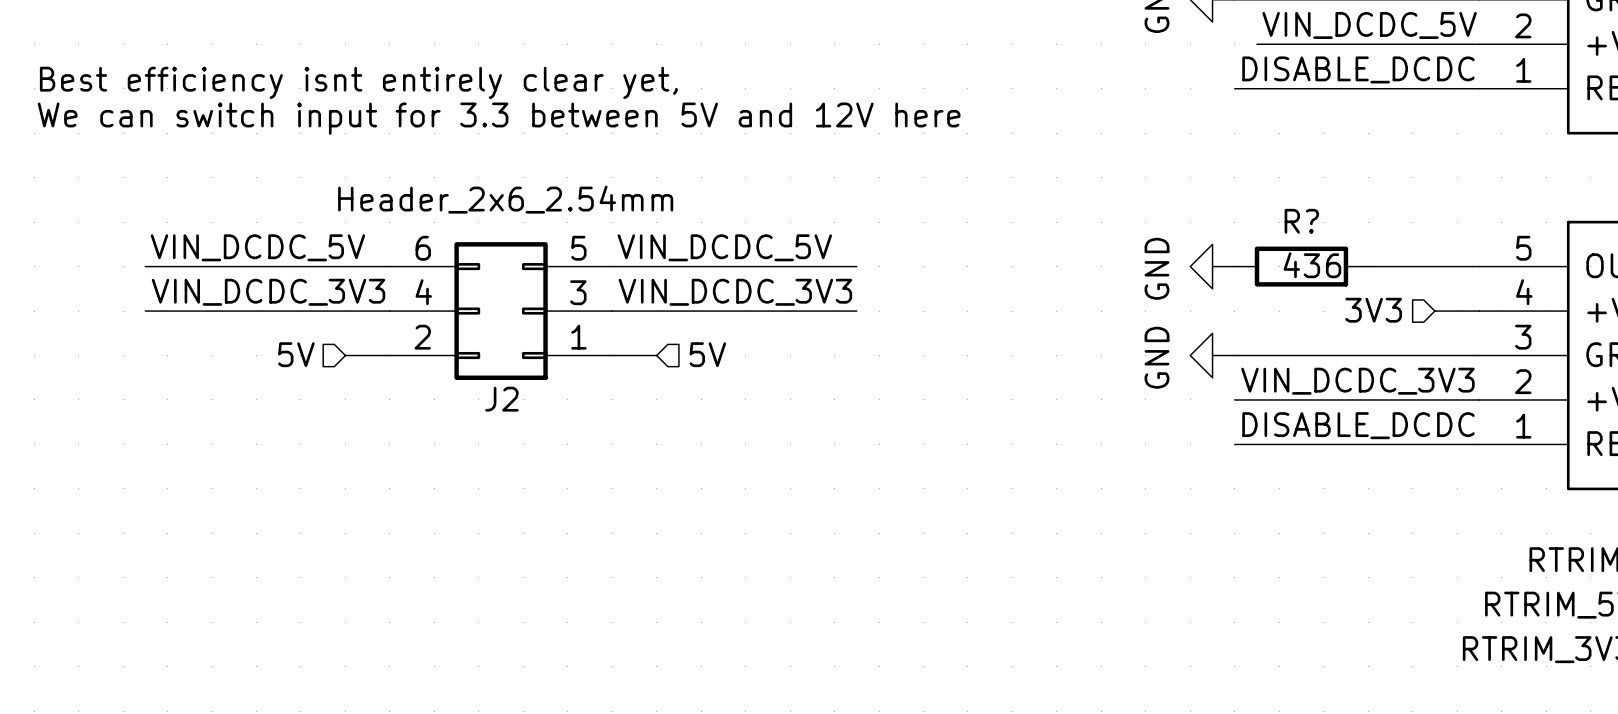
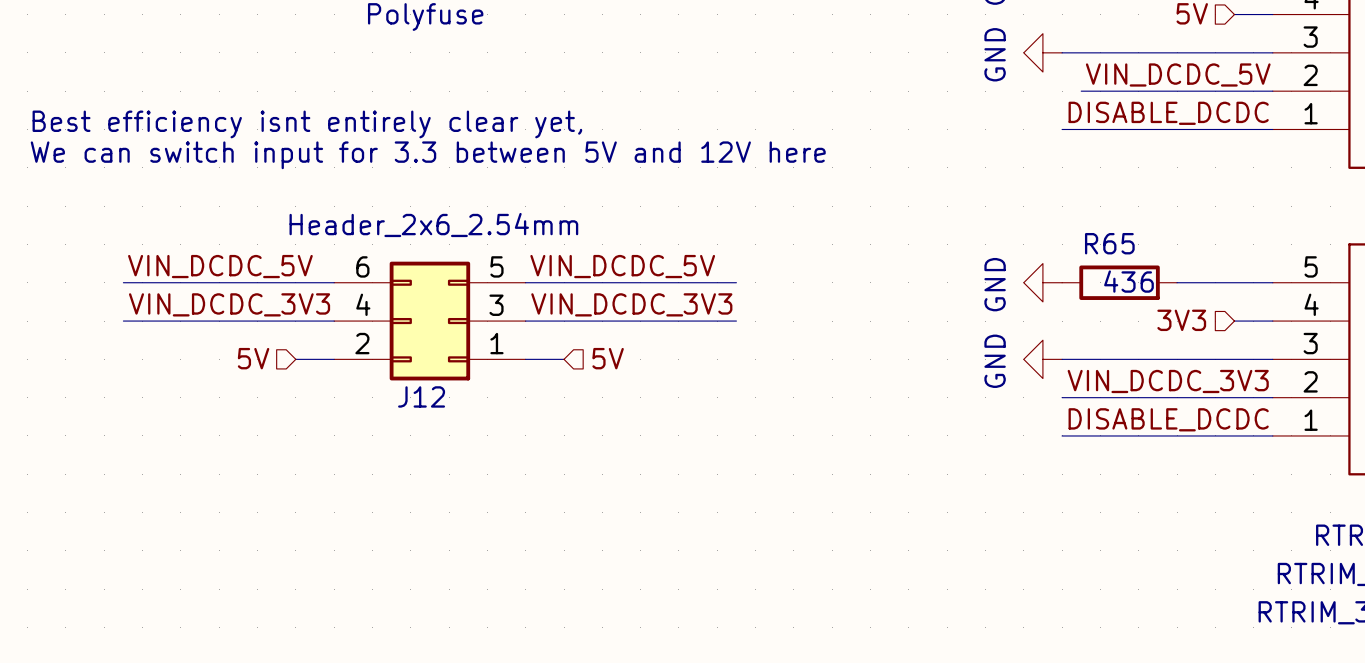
R? name: R? (1301, 221) -> R65 (1109, 243)
J2 name: J2 (501, 399) -> J12 (421, 396)

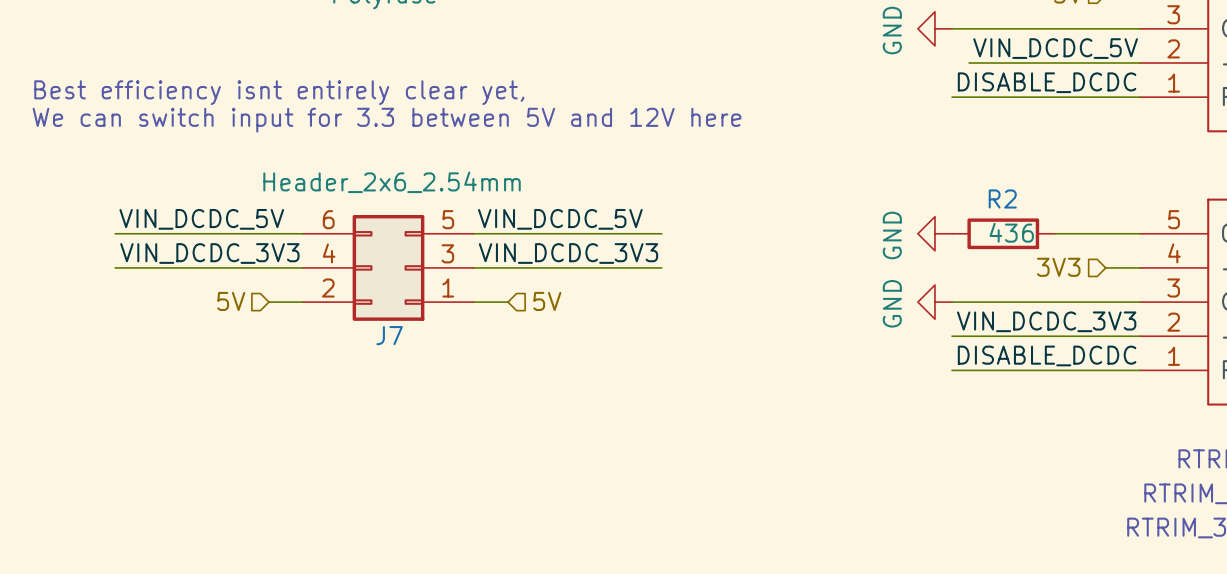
R65 name: R65 (1109, 243) -> R2 (1002, 198)
J12 name: J12 (421, 396) -> J7 (389, 335)

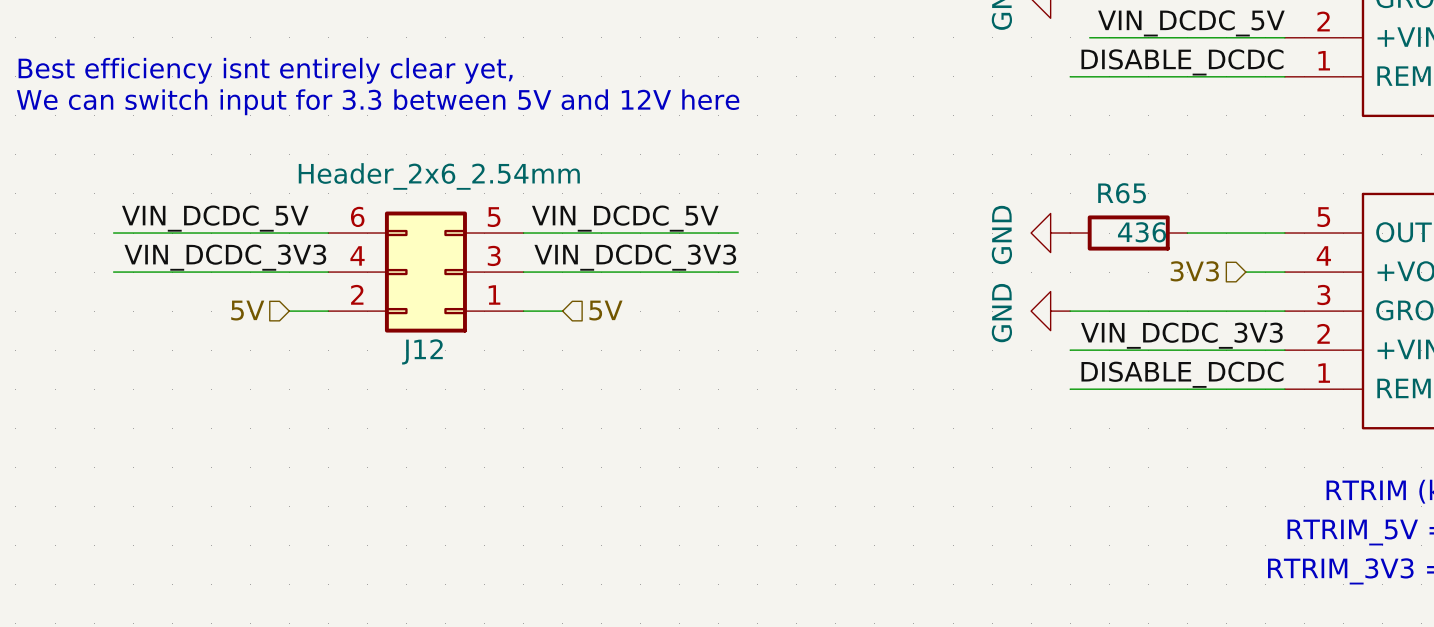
R2 name: R2 (1002, 198) -> R65 (1122, 193)
J7 name: J7 (389, 335) -> J12 (422, 351)

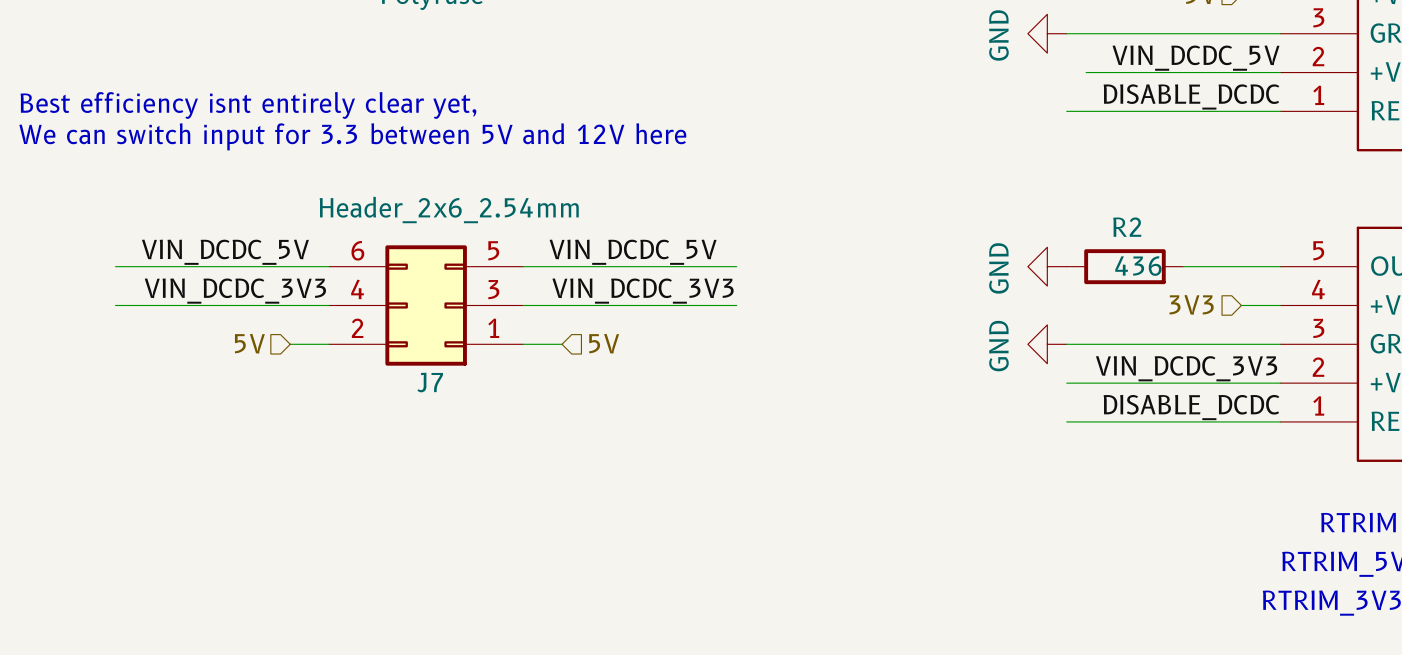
R65 name: R65 (1122, 193) -> R2 (1127, 227)
J12 name: J12 (422, 351) -> J7 (430, 382)

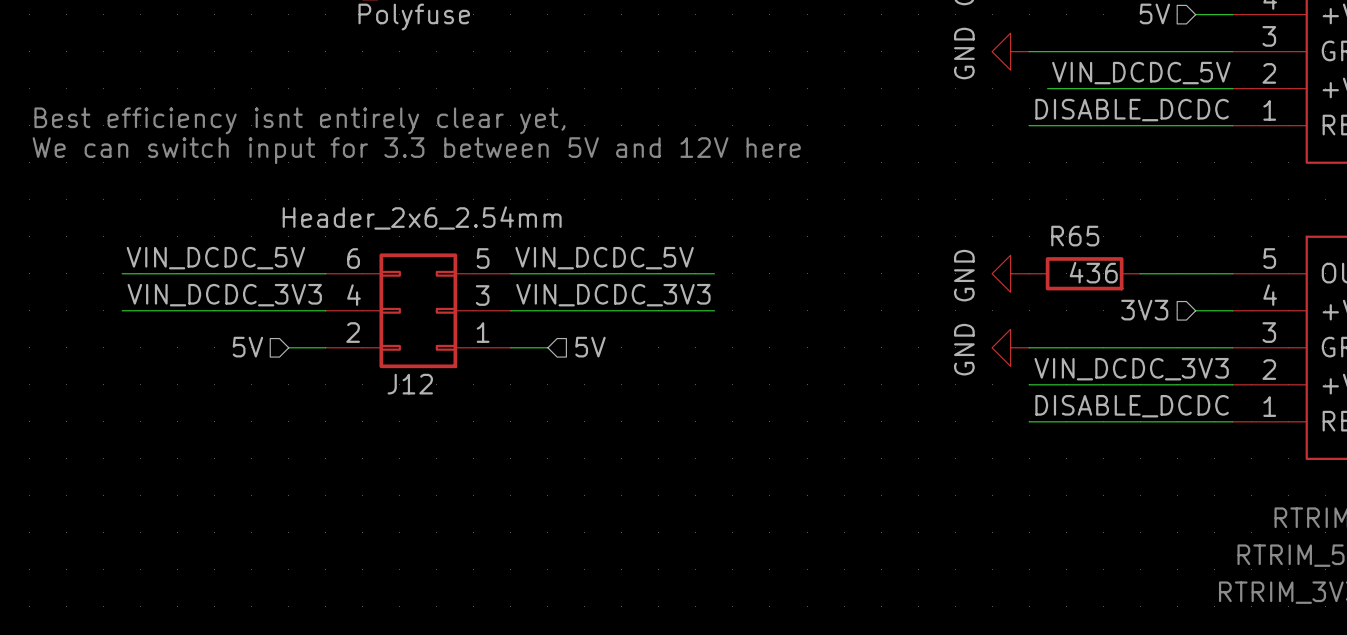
R2 name: R2 (1127, 227) -> R65 (1075, 236)
J7 name: J7 (430, 382) -> J12 (410, 384)

